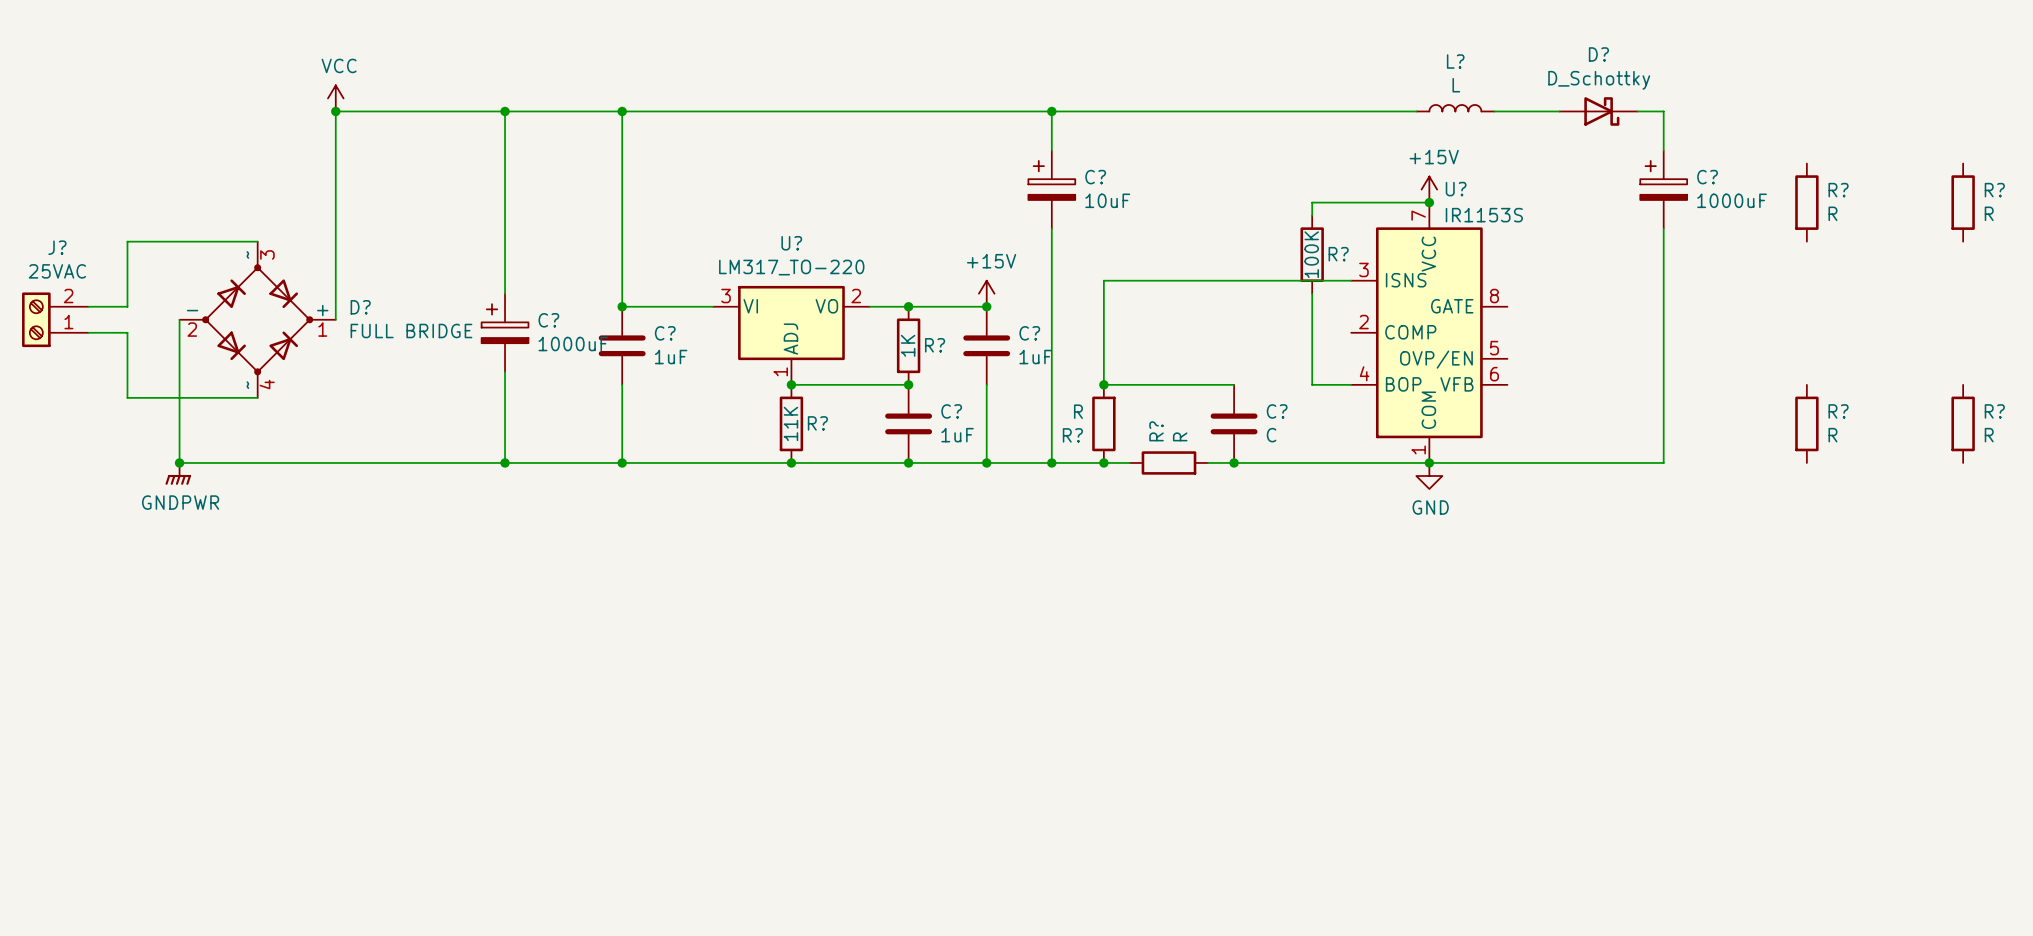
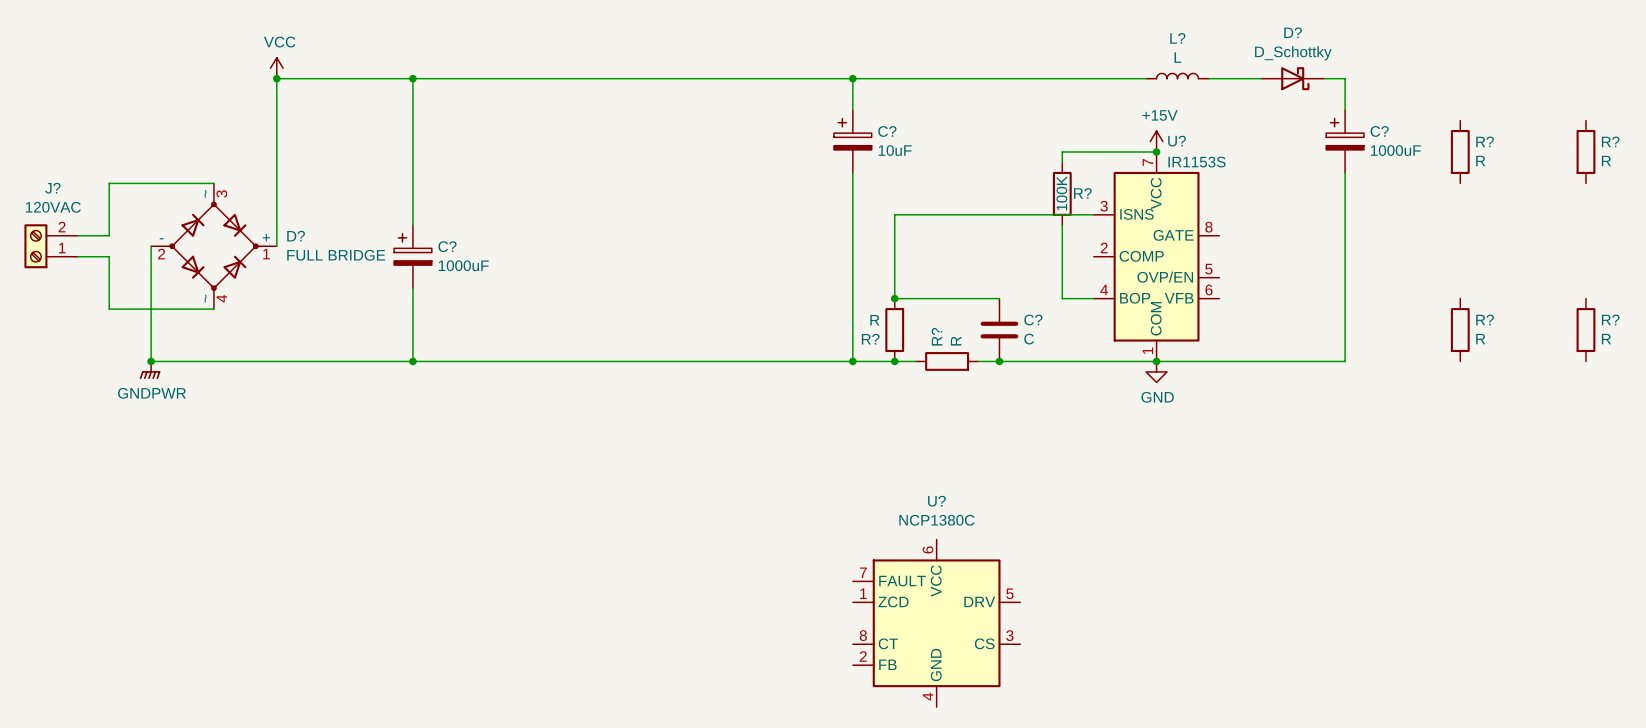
wire: (622, 111) (622, 306) (713, 306) -> none
junction: (622, 111) -> none
J? value: 25VAC (57, 271) -> 120VAC (53, 207)
power symbol: +15V (986, 293) -> none
junction: (622, 306) -> none
wire: (869, 306) (986, 306) -> none
junction: (908, 306) -> none
junction: (986, 306) -> none
U?: LM317_TO-220 (791, 335) -> none
C?: 1uF (622, 345) -> none
R?: 1K (908, 345) -> none
C?: 1uF (986, 345) -> none
wire: (622, 384) (622, 462) -> none
wire: (791, 384) (908, 384) -> none
junction: (791, 384) -> none
junction: (908, 384) -> none
wire: (986, 384) (986, 462) -> none
R?: 11K (791, 423) -> none
C?: 1uF (908, 423) -> none
junction: (622, 462) -> none
junction: (791, 462) -> none
junction: (908, 462) -> none
junction: (986, 462) -> none
U?: none -> NCP1380C (936, 623)

